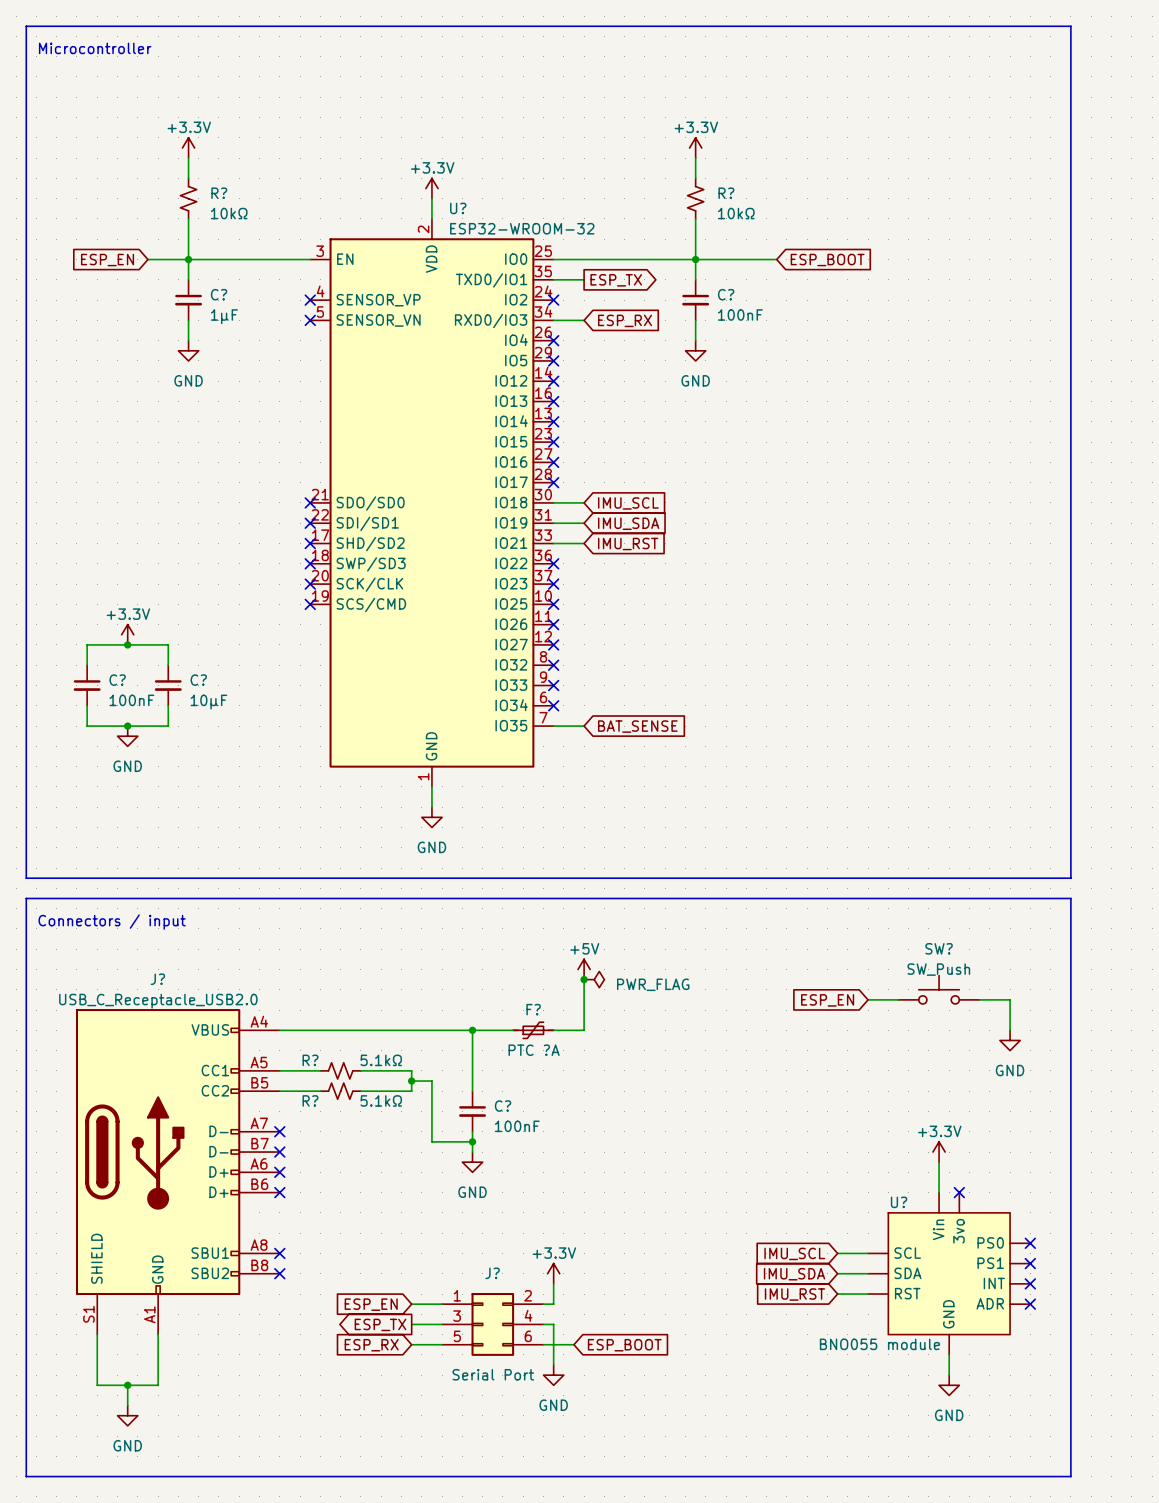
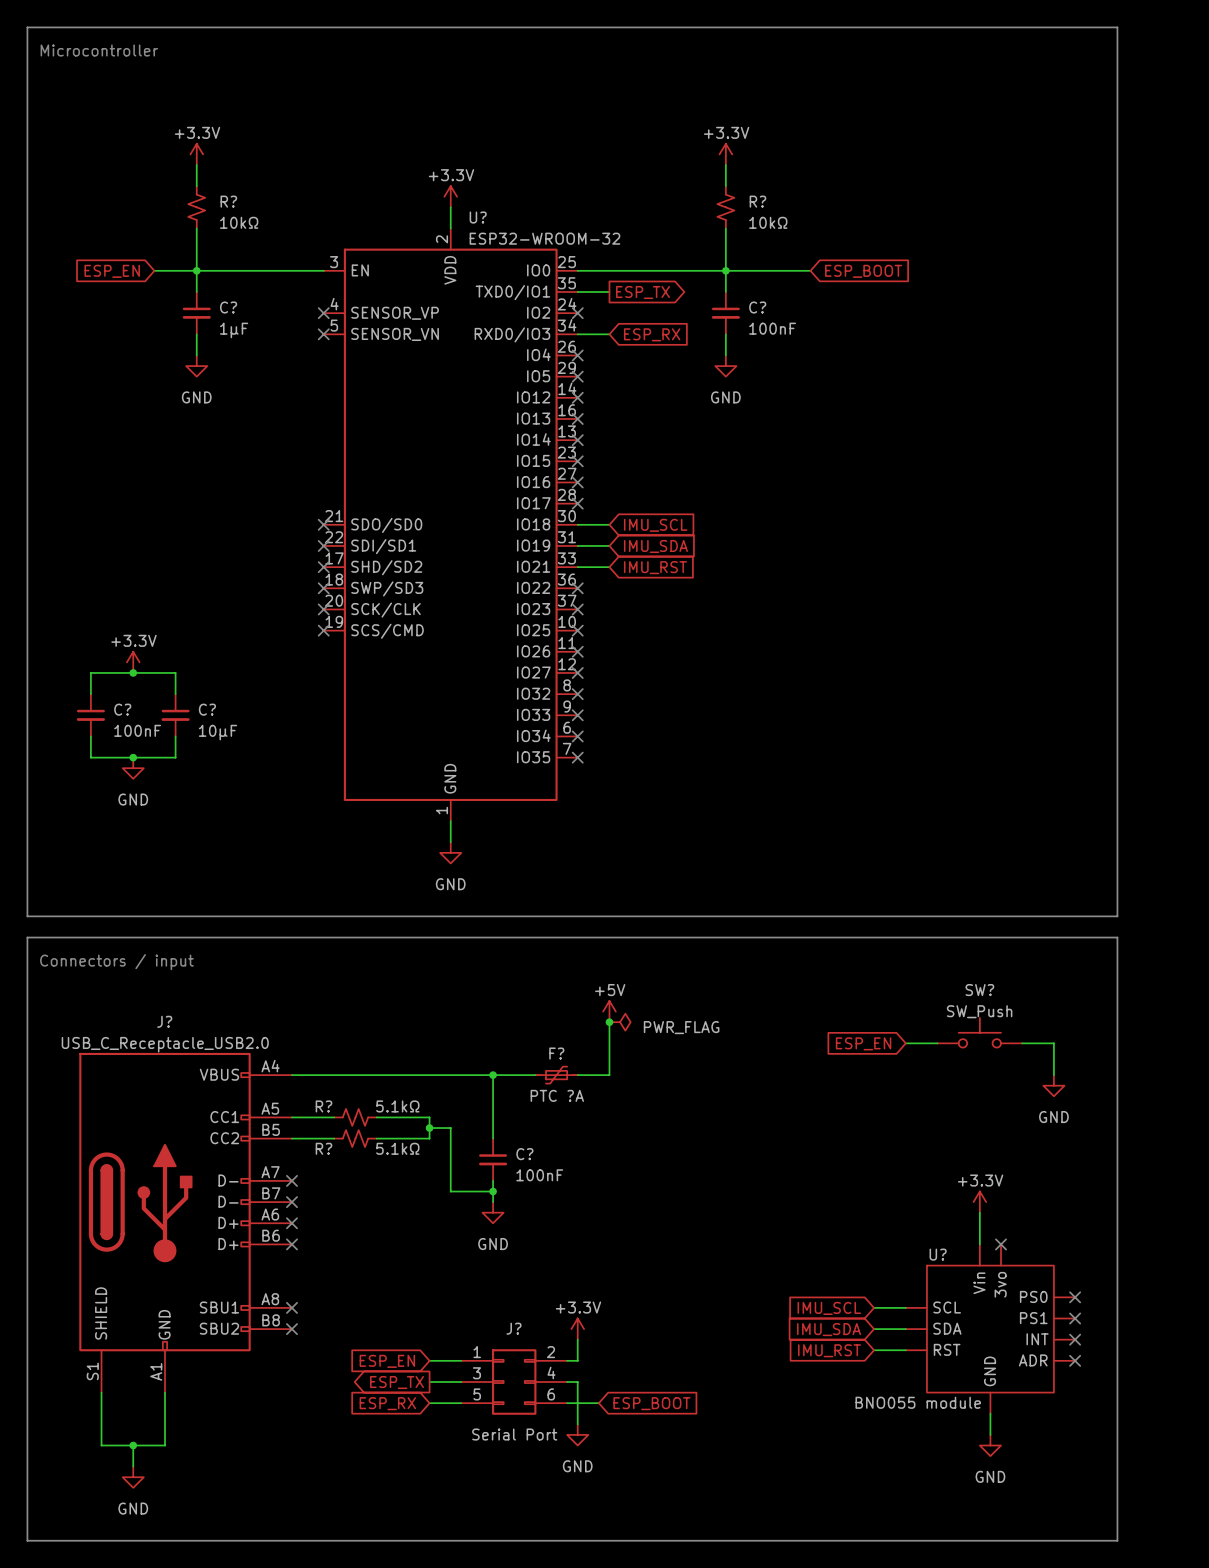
wire: (553, 726) (584, 726) -> none
no-connect mark: none -> (577, 757)
global label: BAT_SENSE (637, 726) -> none

